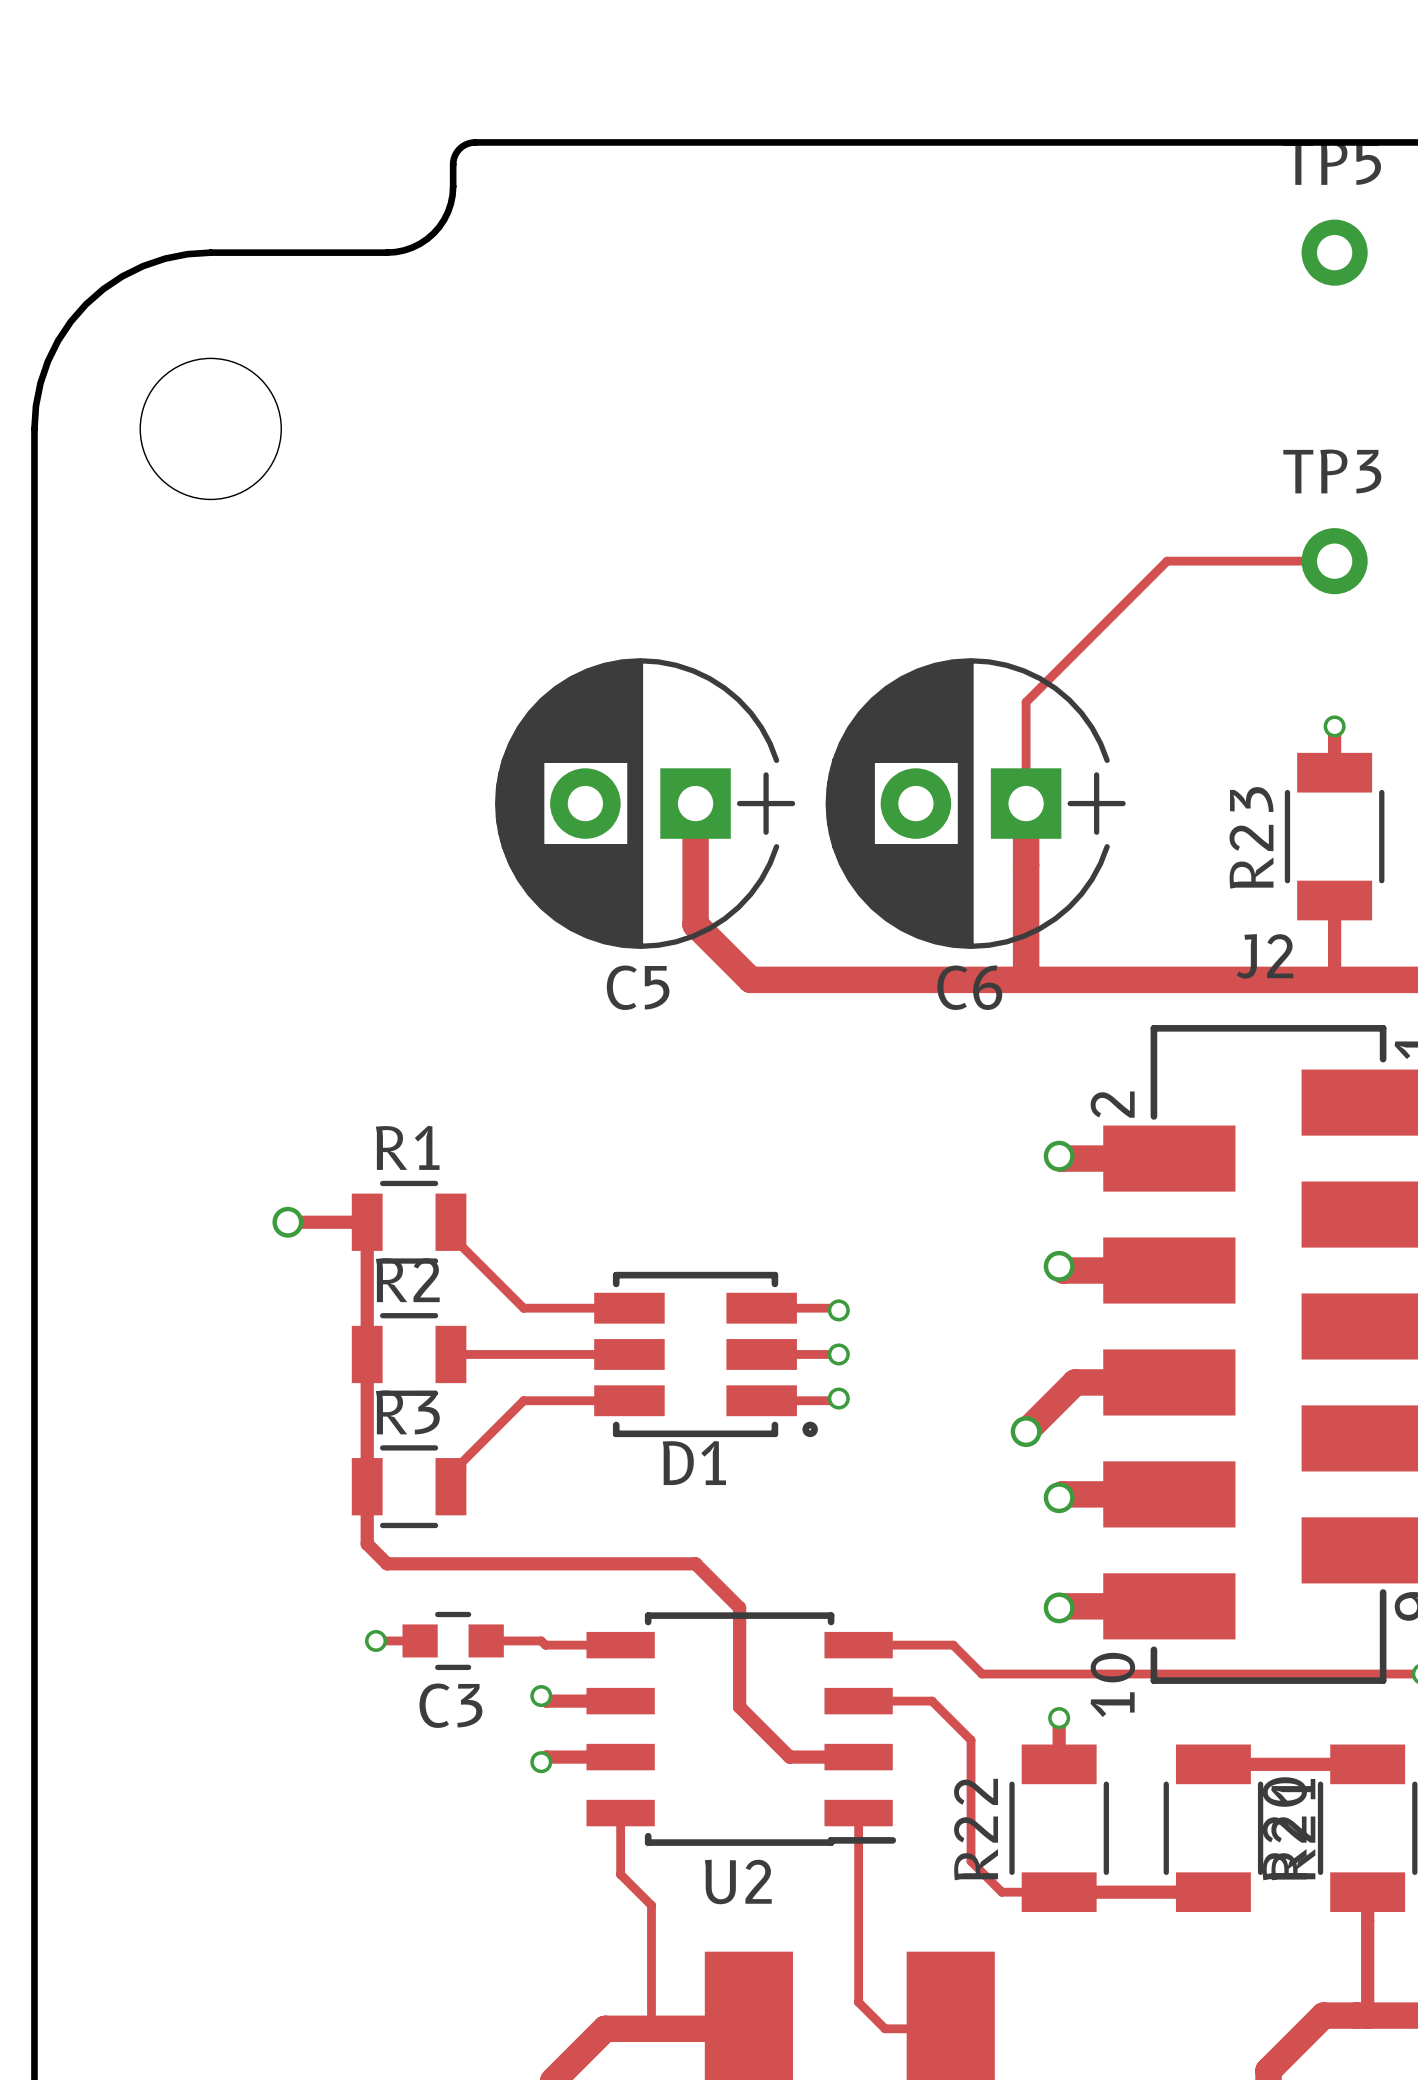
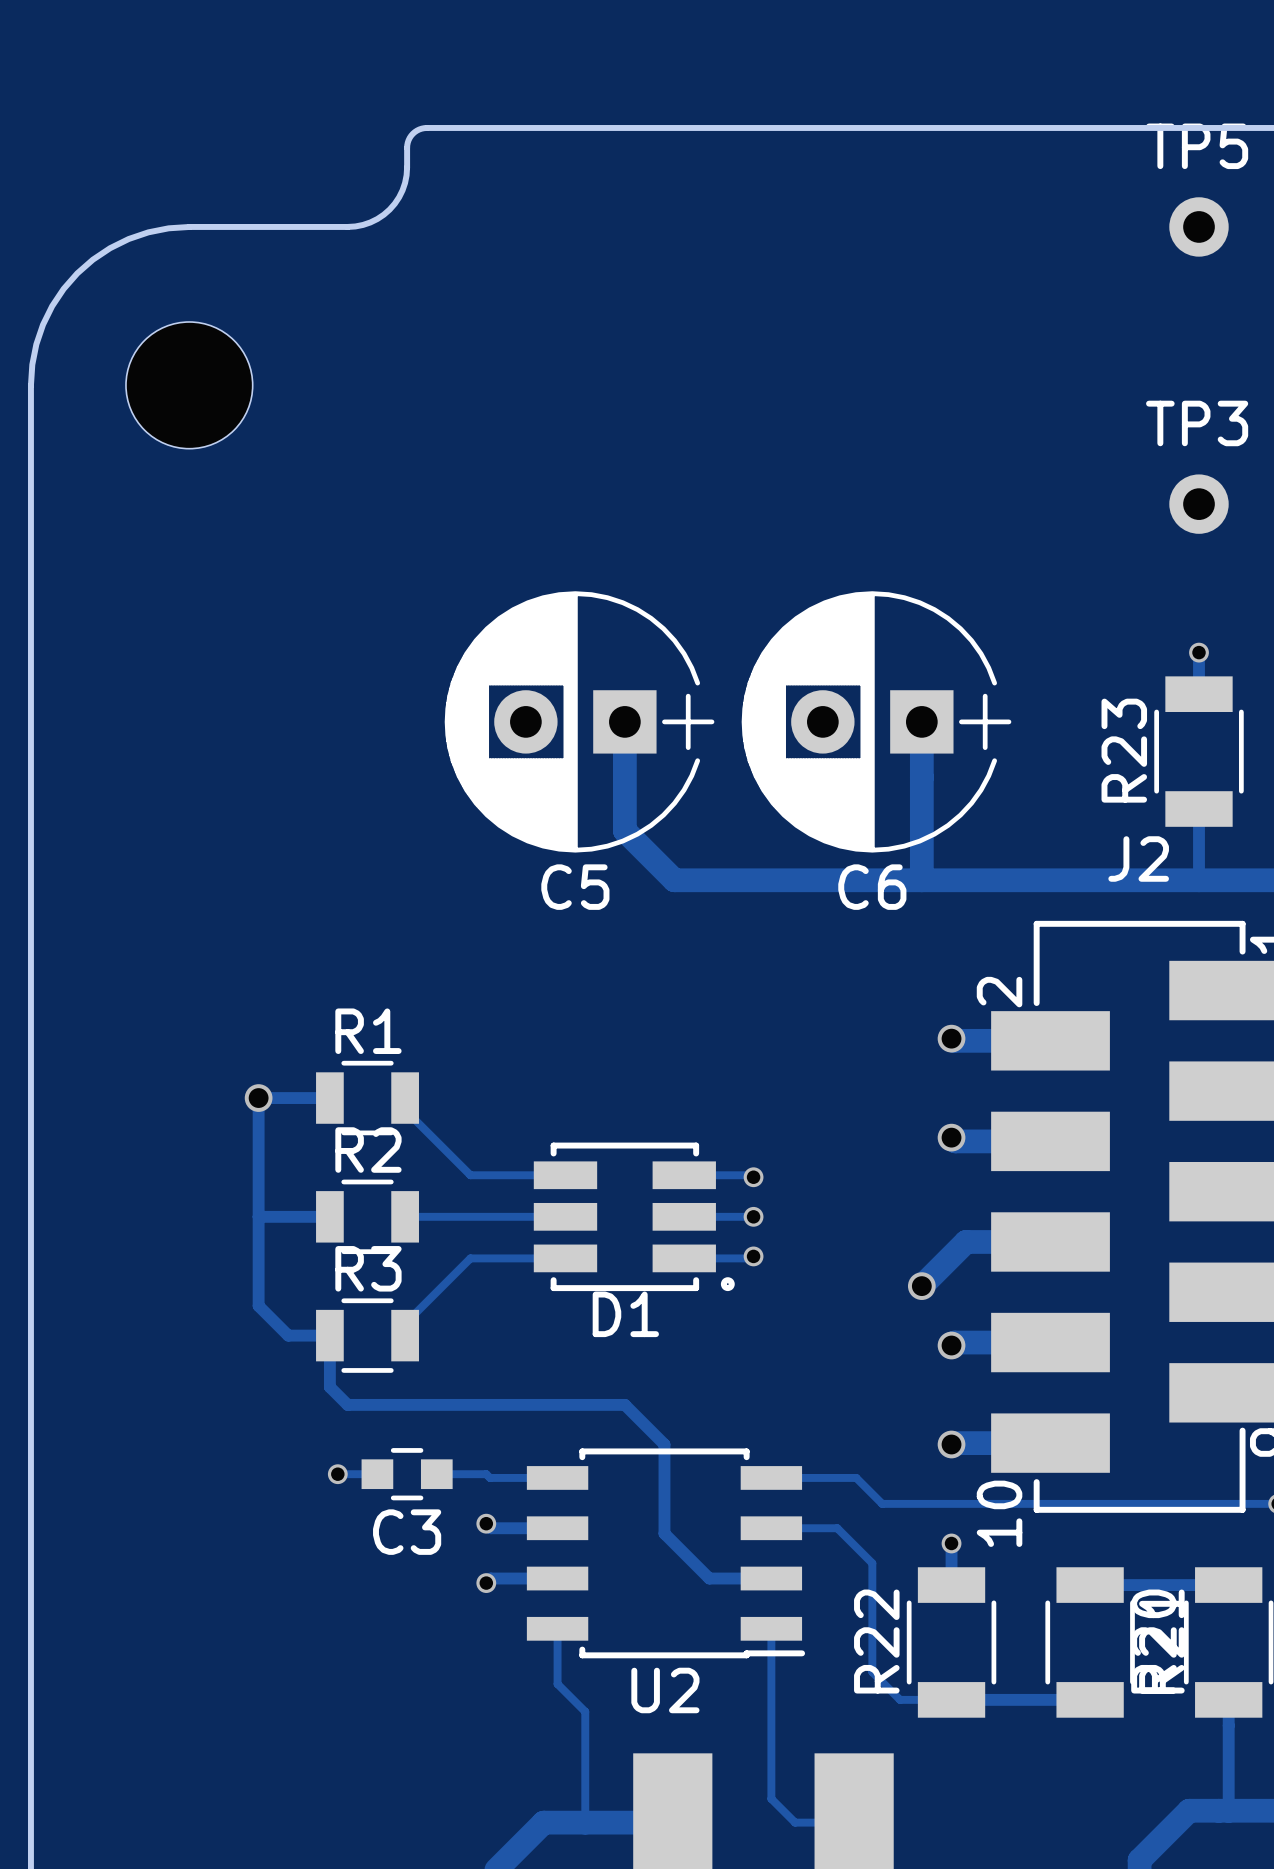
track: (1334, 561) (1167, 561) (1026, 702) (1026, 803) -> none
track: (367, 1222) (367, 1486) -> (258, 1098) (258, 1305) (288, 1335) (329, 1335)
track: none -> (258, 1216) (329, 1216)

